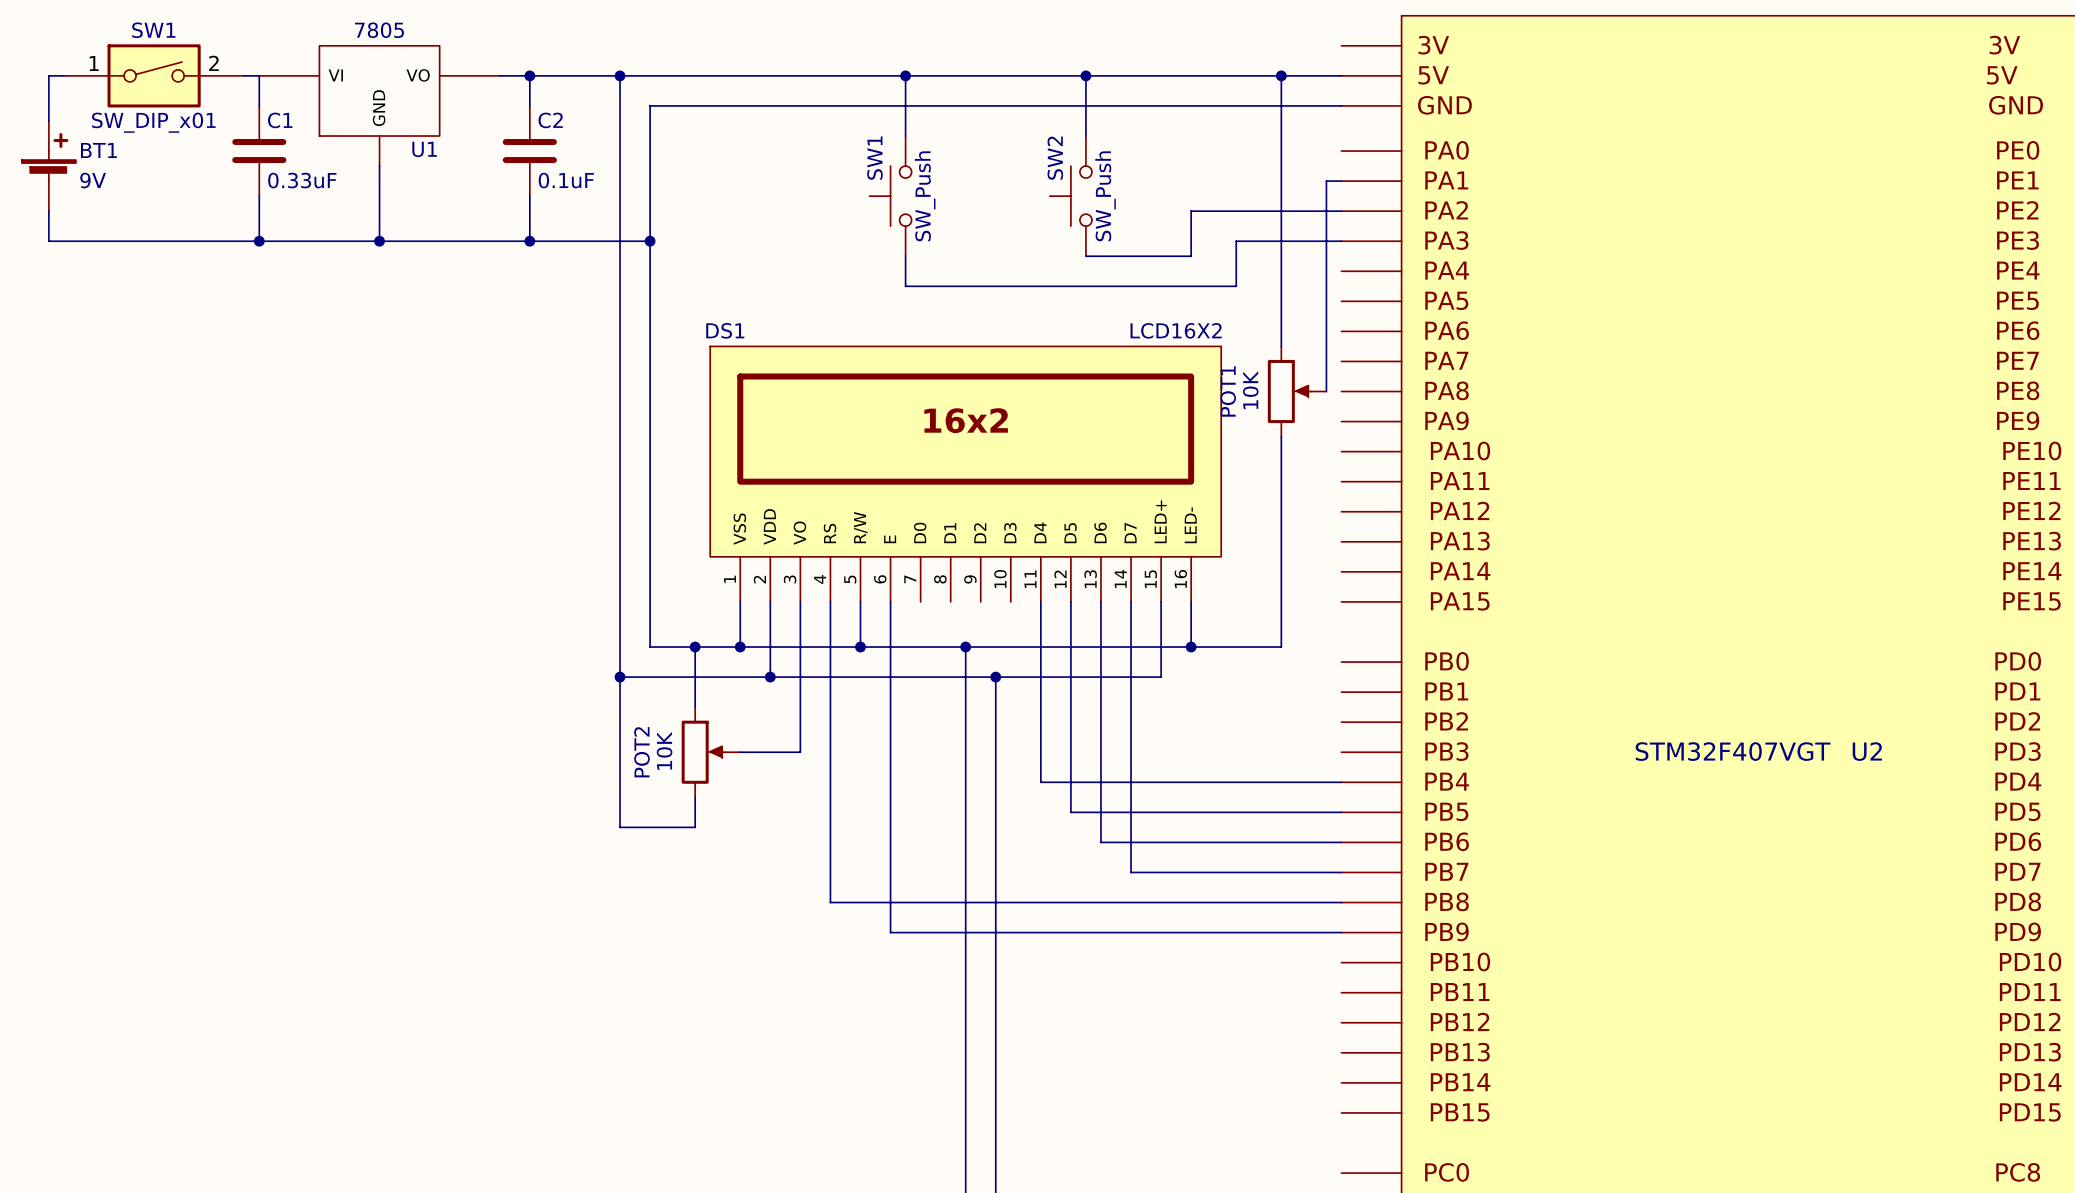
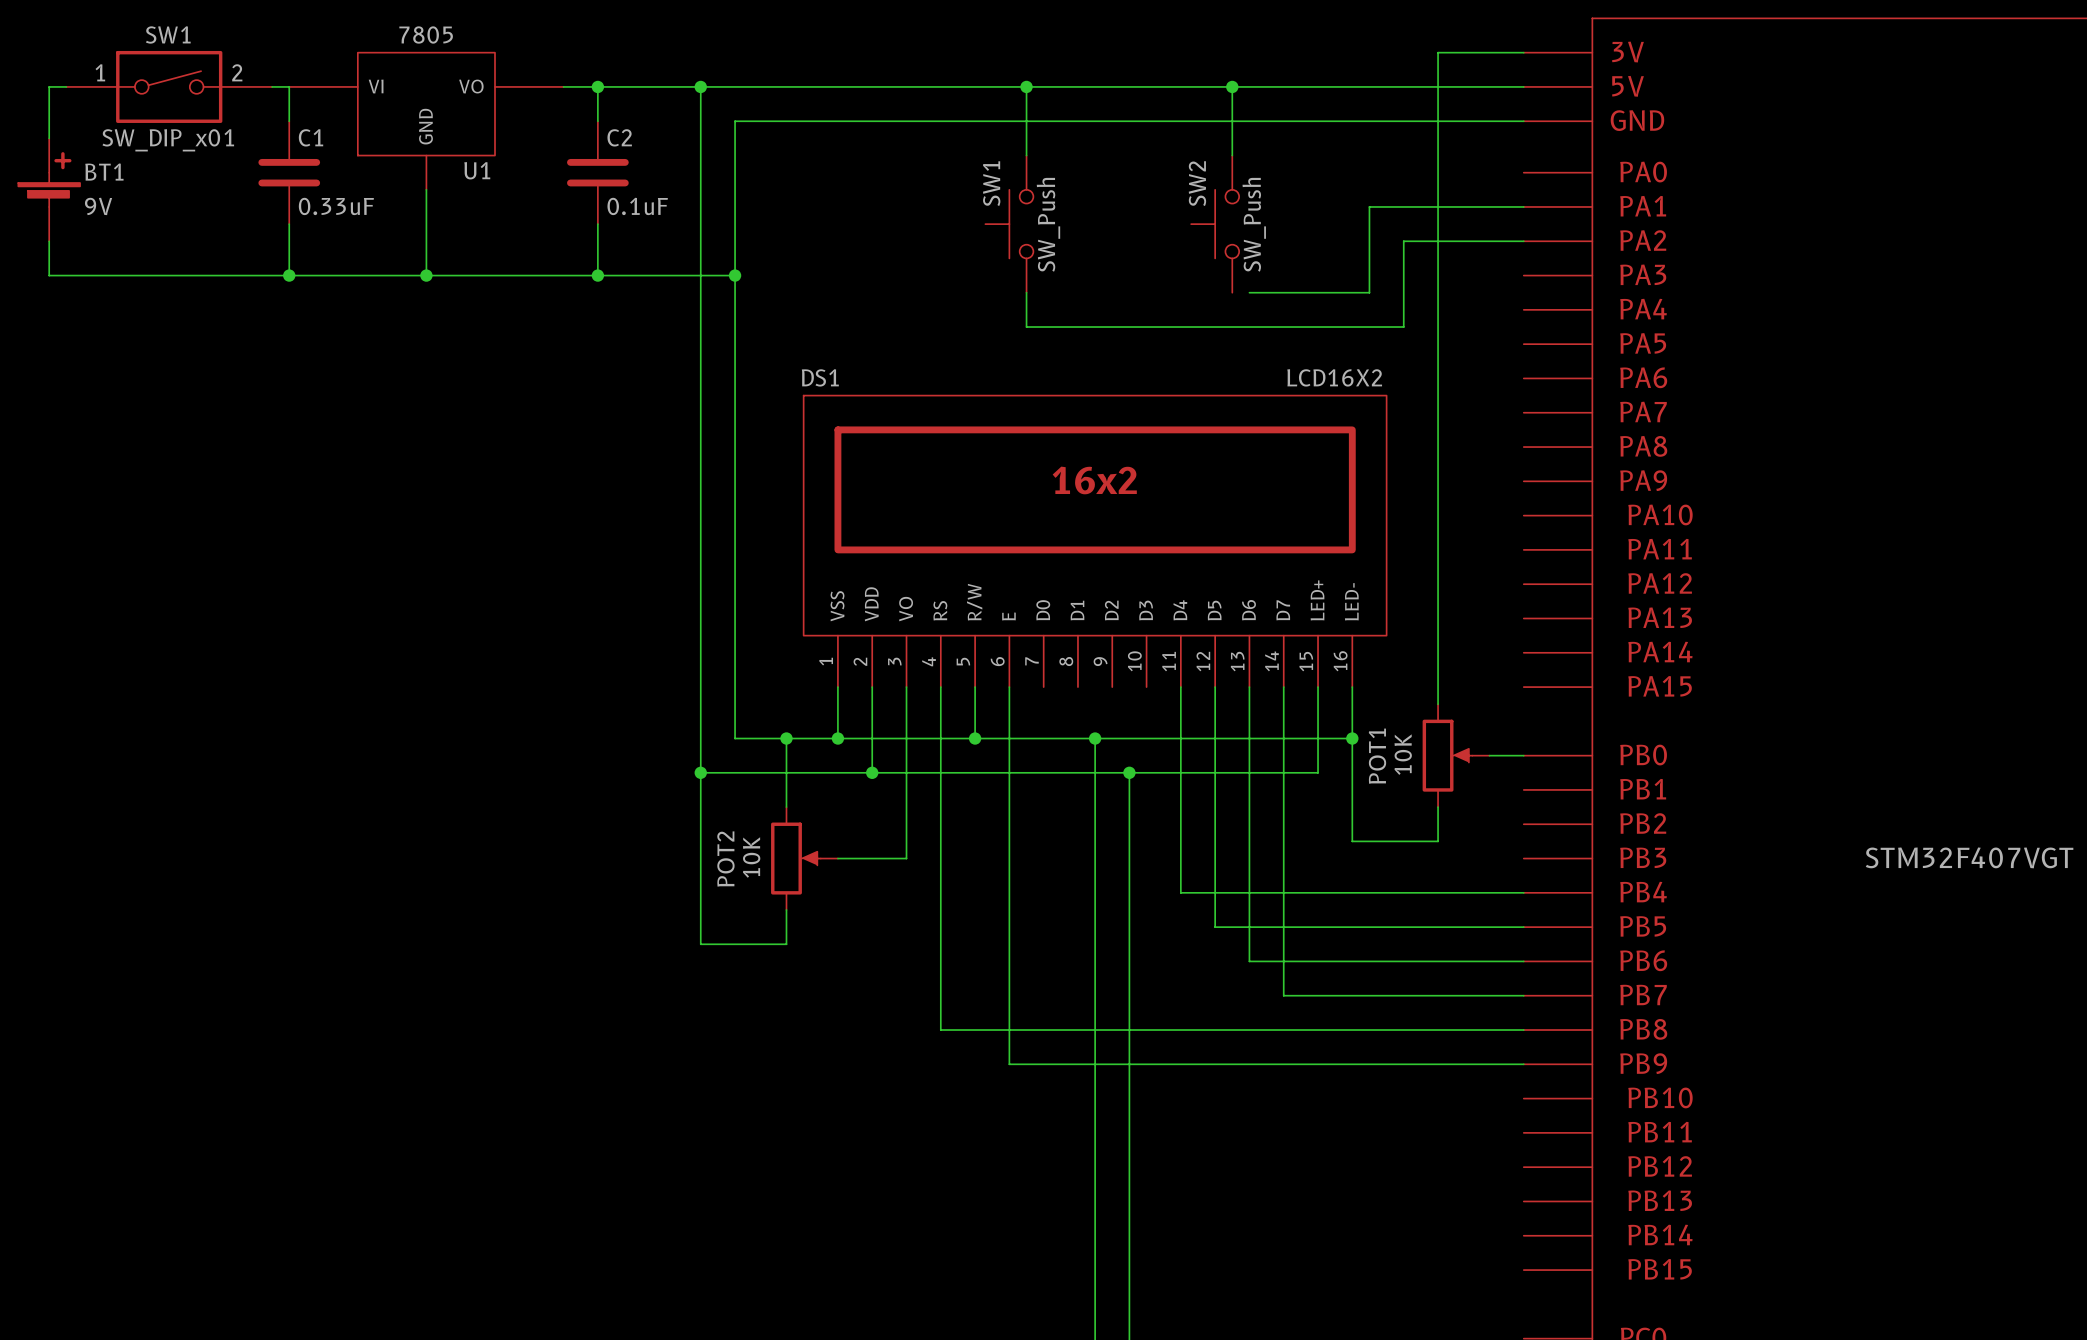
wire: none -> (1523, 52) (1438, 52) (1438, 704)
wire: (1281, 75) (1281, 346) -> none
junction: (1281, 75) -> none
wire: (1326, 181) (1326, 391) -> (1506, 206) (1369, 206) (1369, 292) (1352, 292)
wire: (1236, 211) (1191, 211) (1191, 256) -> (1403, 241) (1403, 275)
wire: (1236, 241) (1341, 241) -> none
wire: (1085, 256) (1100, 256) -> none
POT1 position: (1297, 391) -> (1456, 755)
wire: (1281, 436) (1281, 647) (1191, 647) -> (1438, 807) (1438, 841) (1352, 841) (1352, 738)
wire: none -> (1489, 755) (1523, 755)

